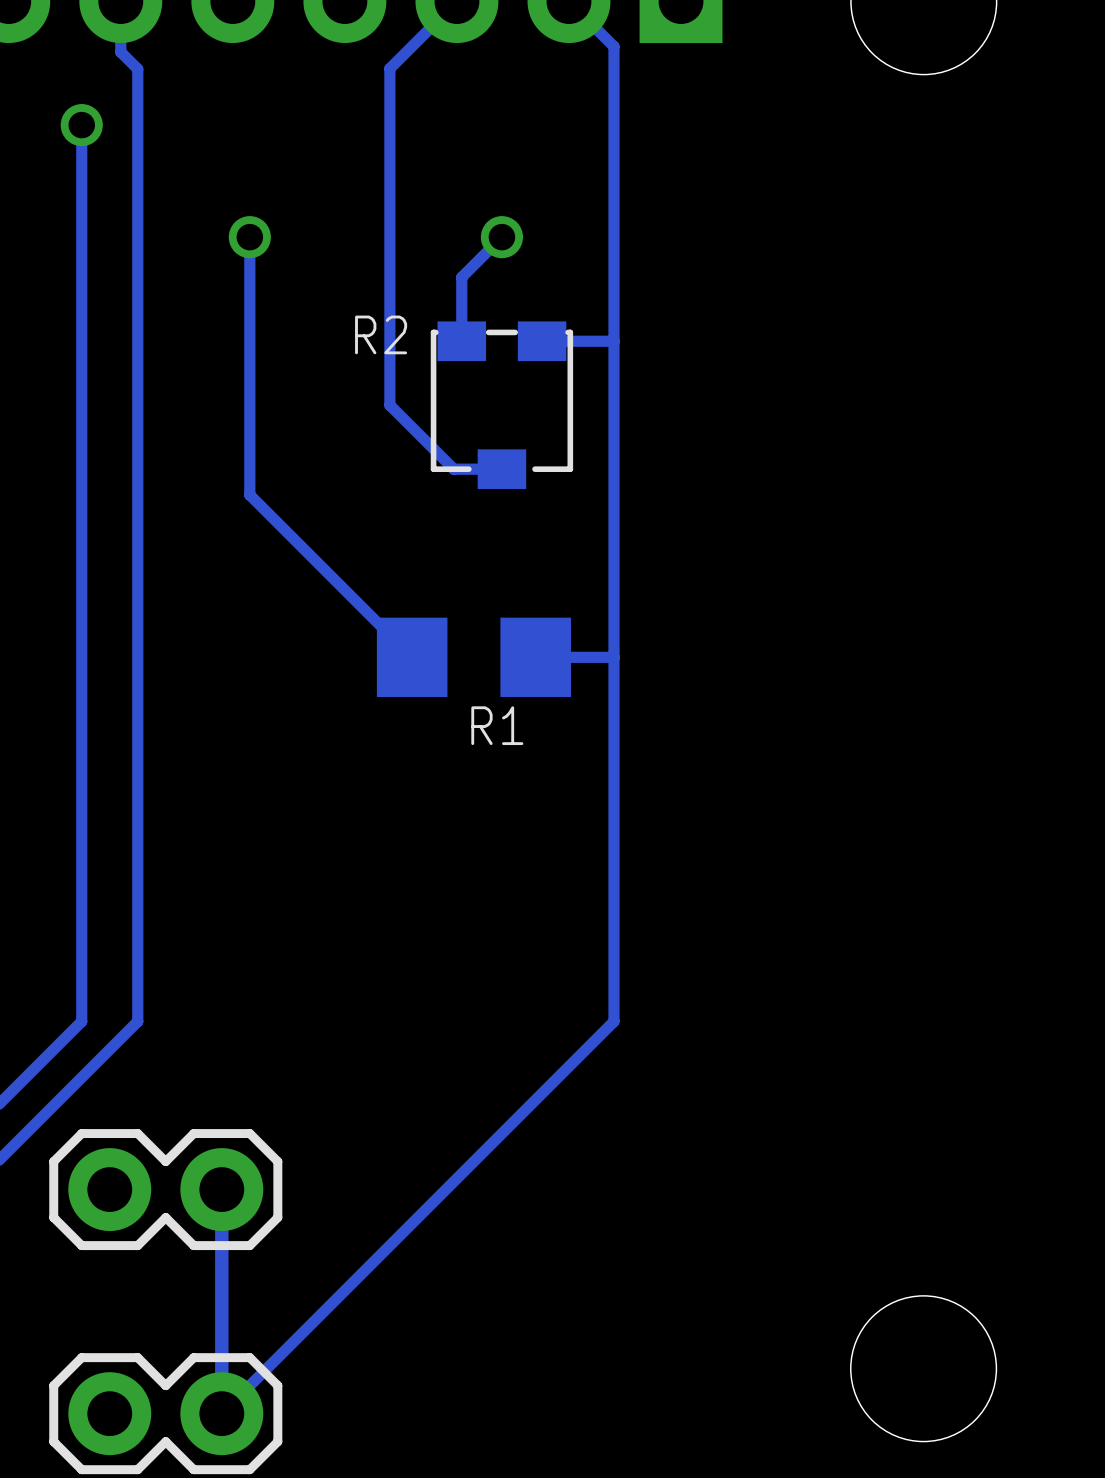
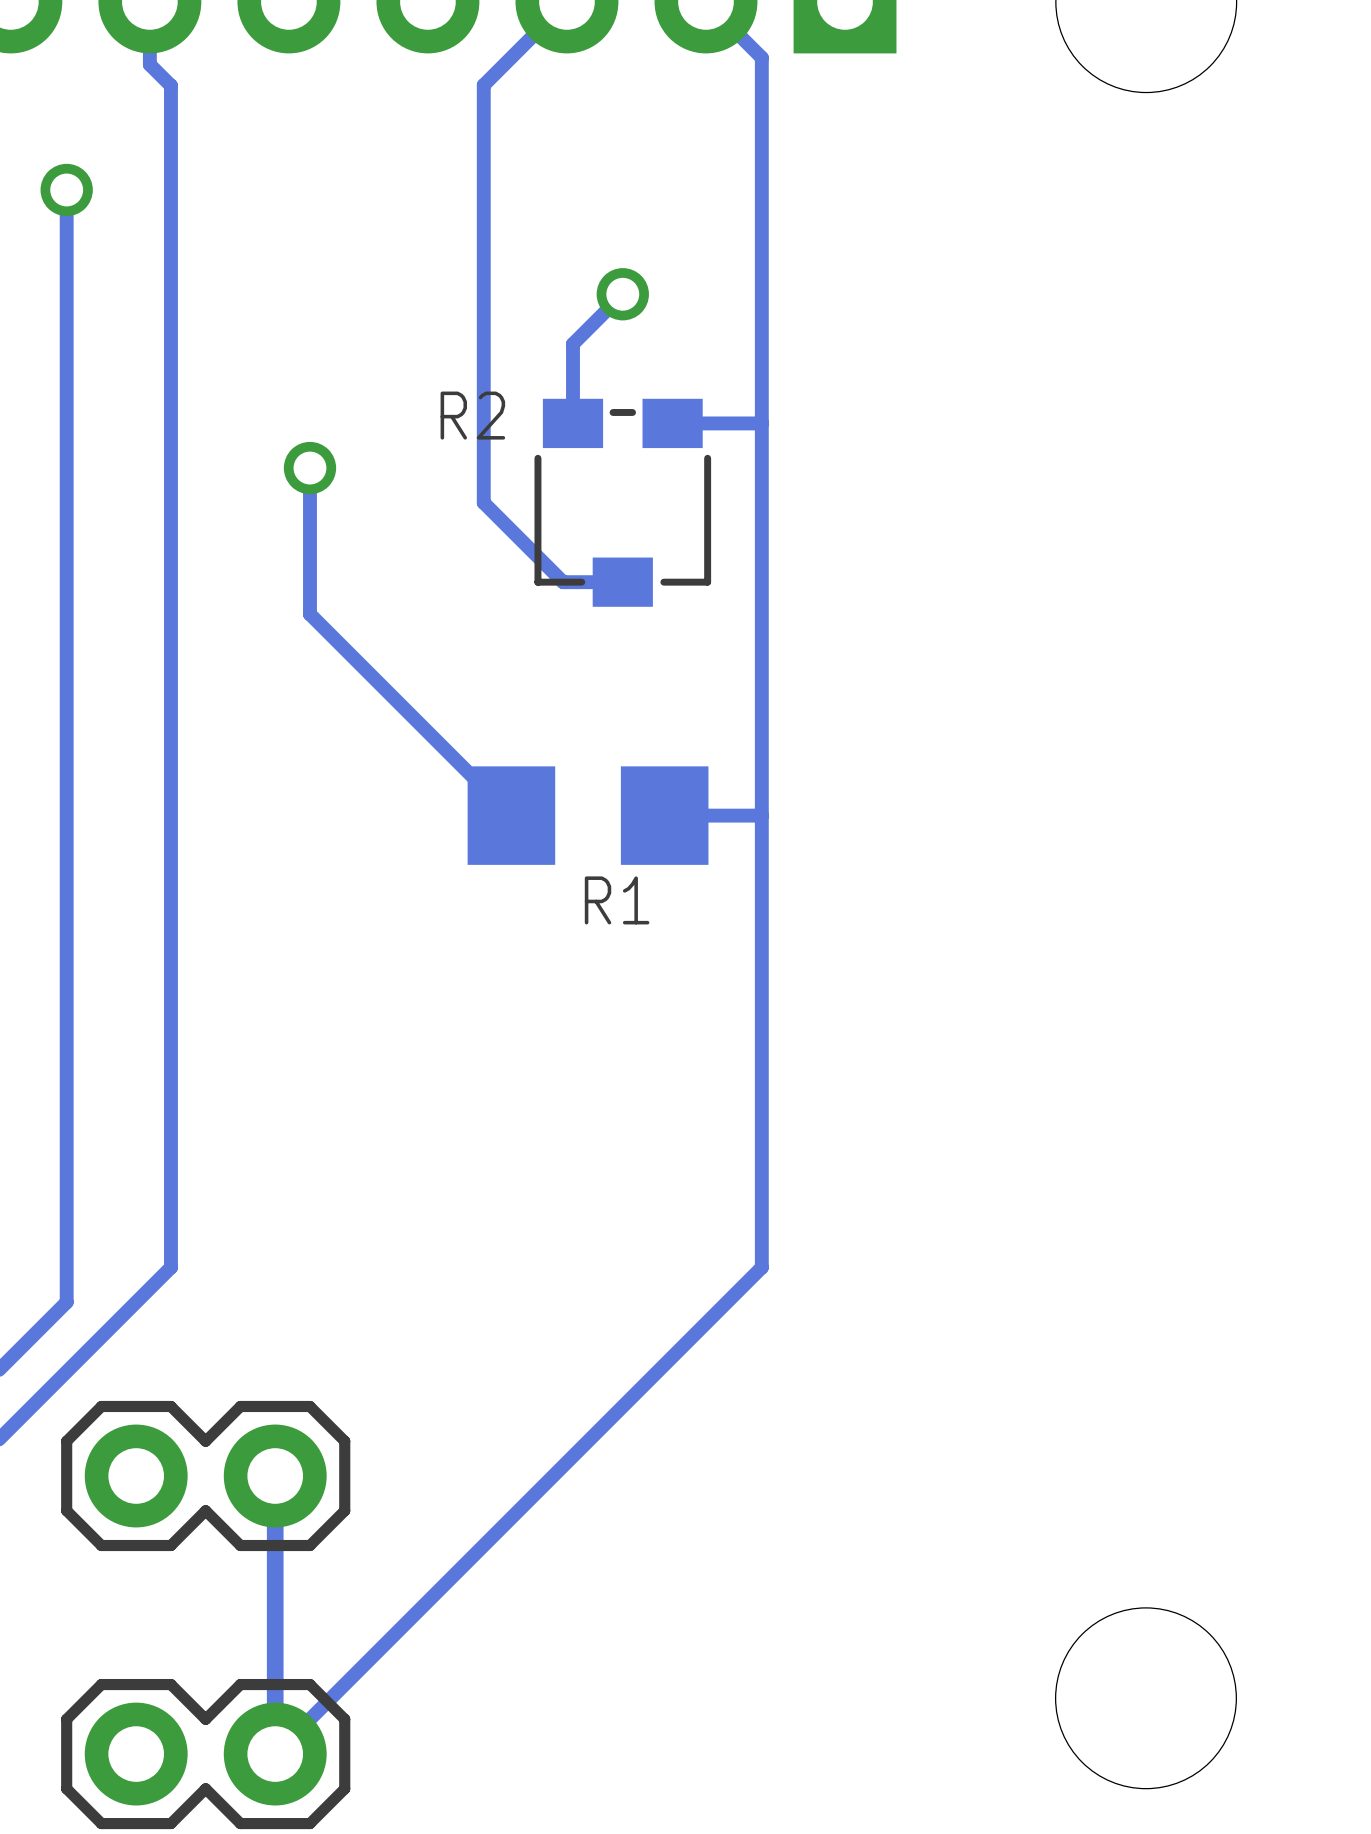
track: (81, 125) (81, 1021) (53, 1049) -> (66, 189) (66, 1302)
via position: (81, 125) -> (66, 189)
track: (249, 237) (249, 494) -> (309, 468) (309, 614)
via: (249, 237) -> none
R2 footprint: [430, 321, 574, 490] -> [534, 398, 712, 607]
via: none -> (309, 468)

